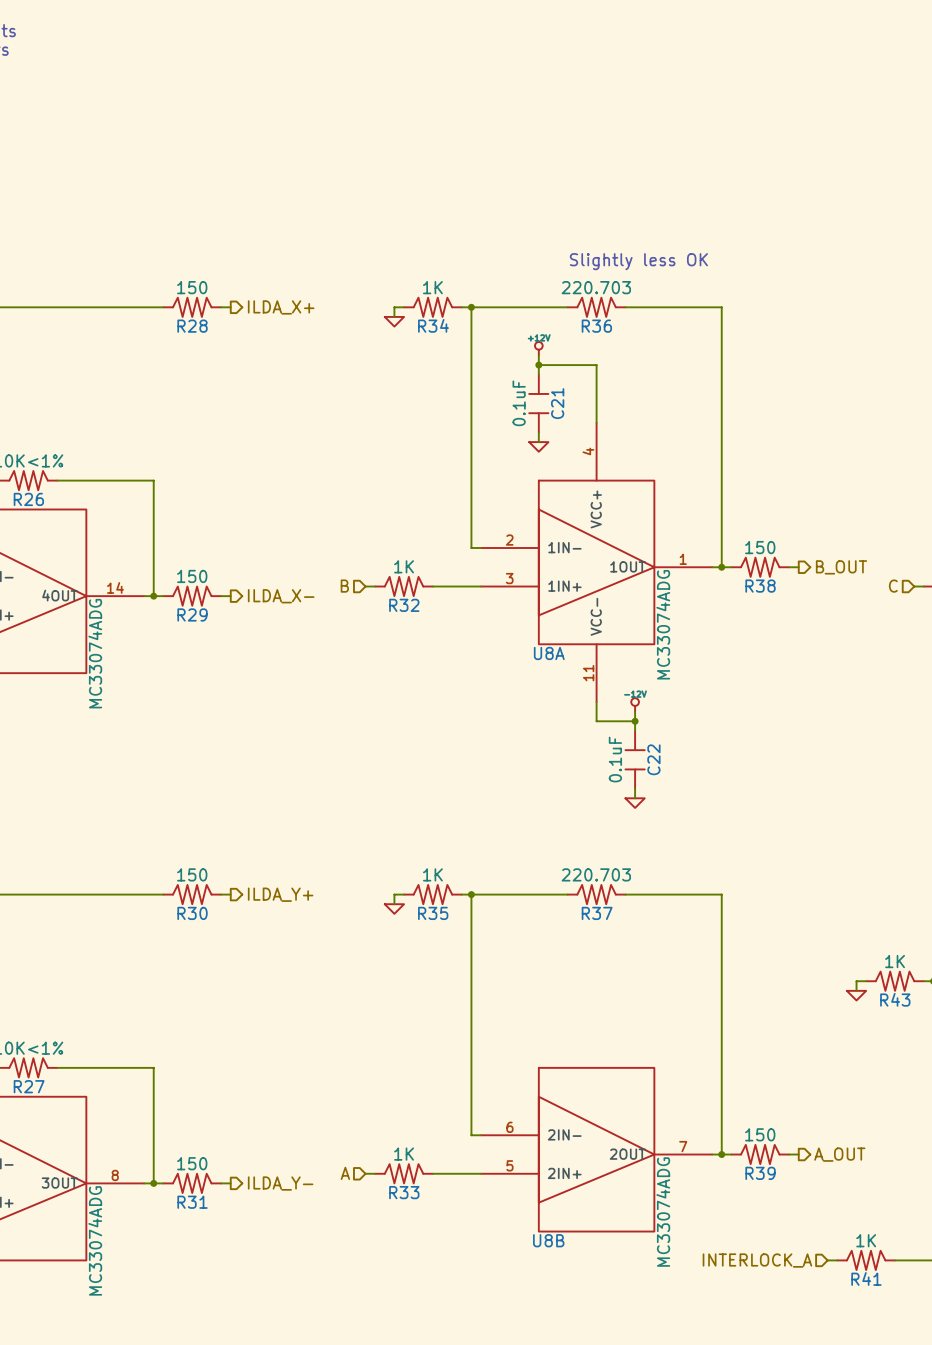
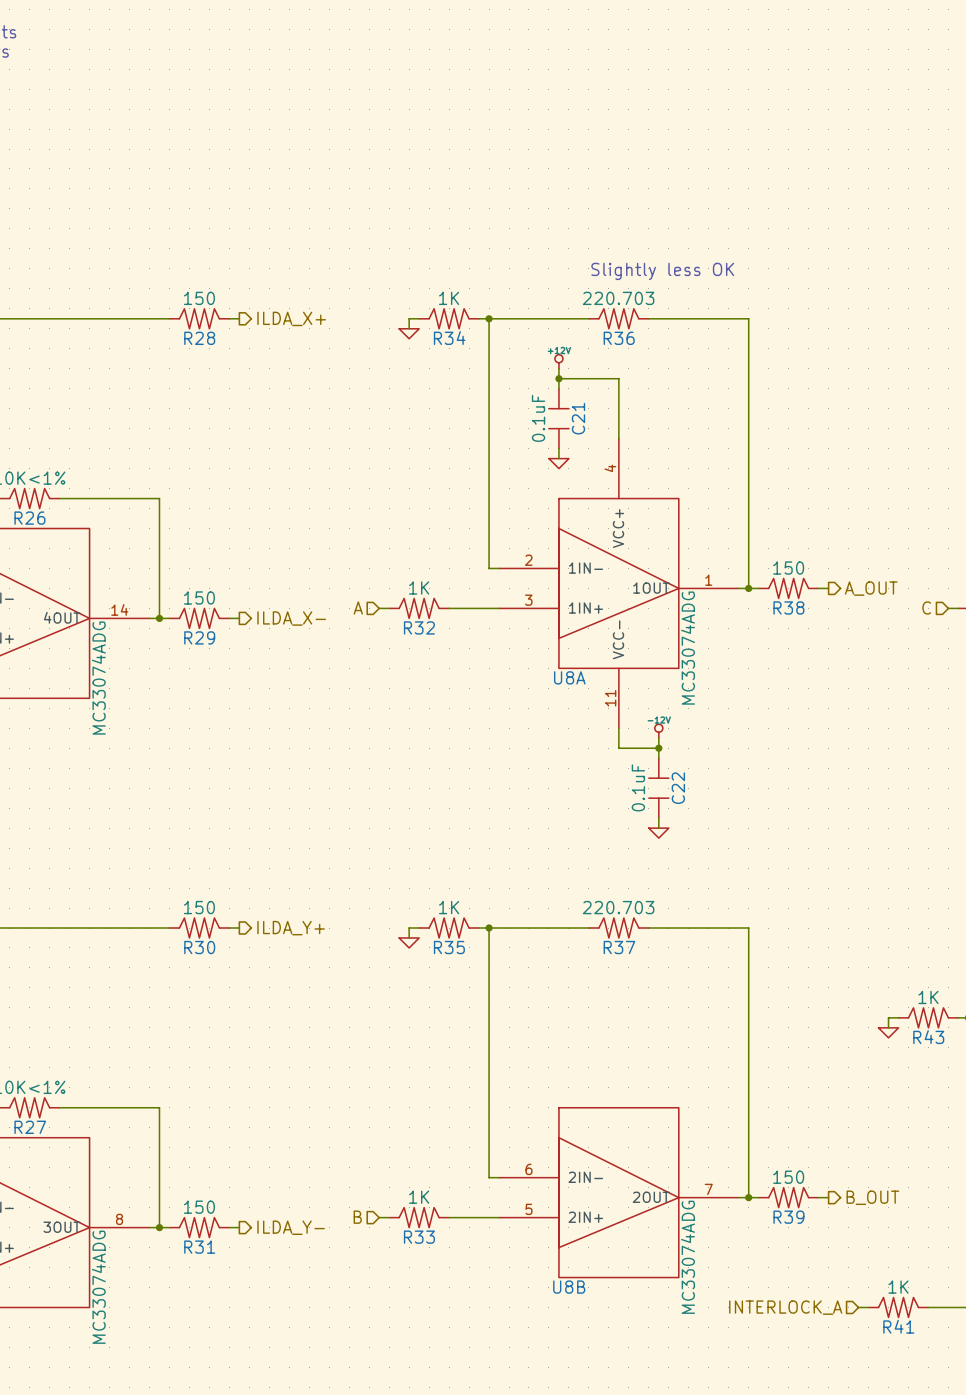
hierarchical label: B_OUT (841, 567) -> A_OUT (871, 588)
hierarchical label: B (344, 586) -> A (358, 607)
hierarchical label: A_OUT (839, 1154) -> B_OUT (872, 1197)
hierarchical label: A (345, 1173) -> B (357, 1217)

